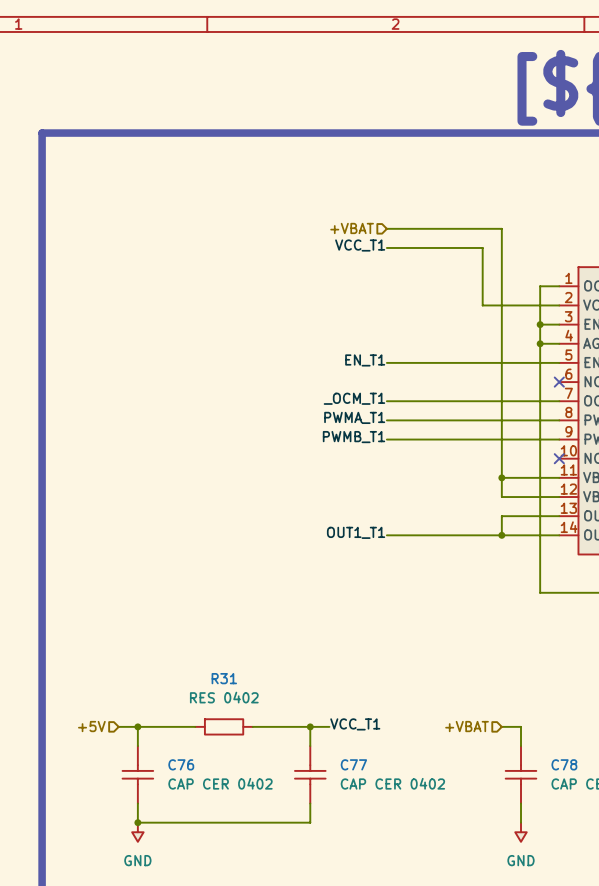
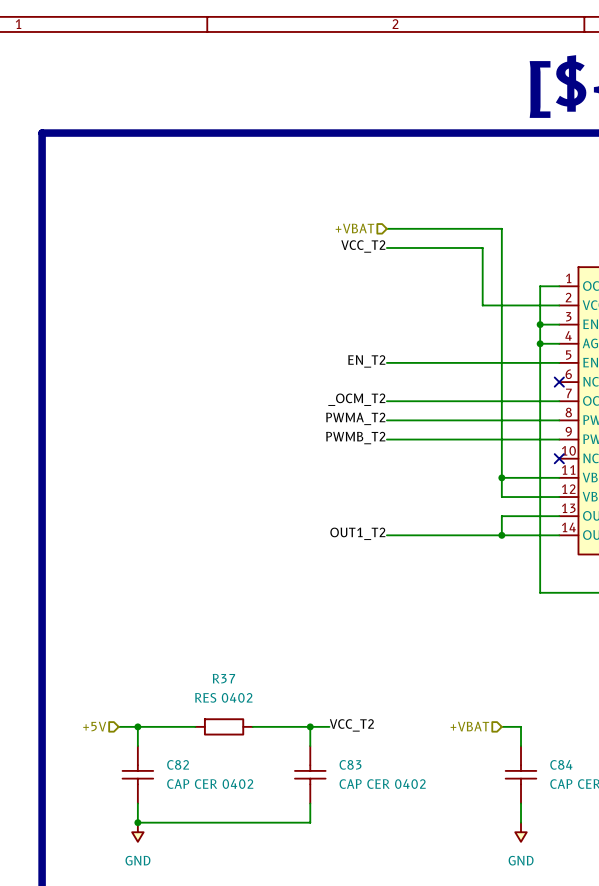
label: VCC_T1 (360, 245) -> VCC_T2 (363, 246)
label: EN_T1 (365, 360) -> EN_T2 (366, 361)
label: _OCM_T1 (354, 398) -> _OCM_T2 (356, 399)
label: PWMA_T1 (354, 417) -> PWMA_T2 (355, 418)
label: PWMB_T1 (353, 437) -> PWMB_T2 (355, 438)
label: OUT1_T1 (356, 532) -> OUT1_T2 (357, 533)
R31 name: R31 (224, 678) -> R37 (223, 678)
label: VCC_T1 (355, 724) -> VCC_T2 (351, 725)
C76 name: C76 (181, 764) -> C82 (178, 764)
C77 name: C77 (353, 764) -> C83 (350, 764)
C78 name: C78 (564, 764) -> C84 (561, 764)

